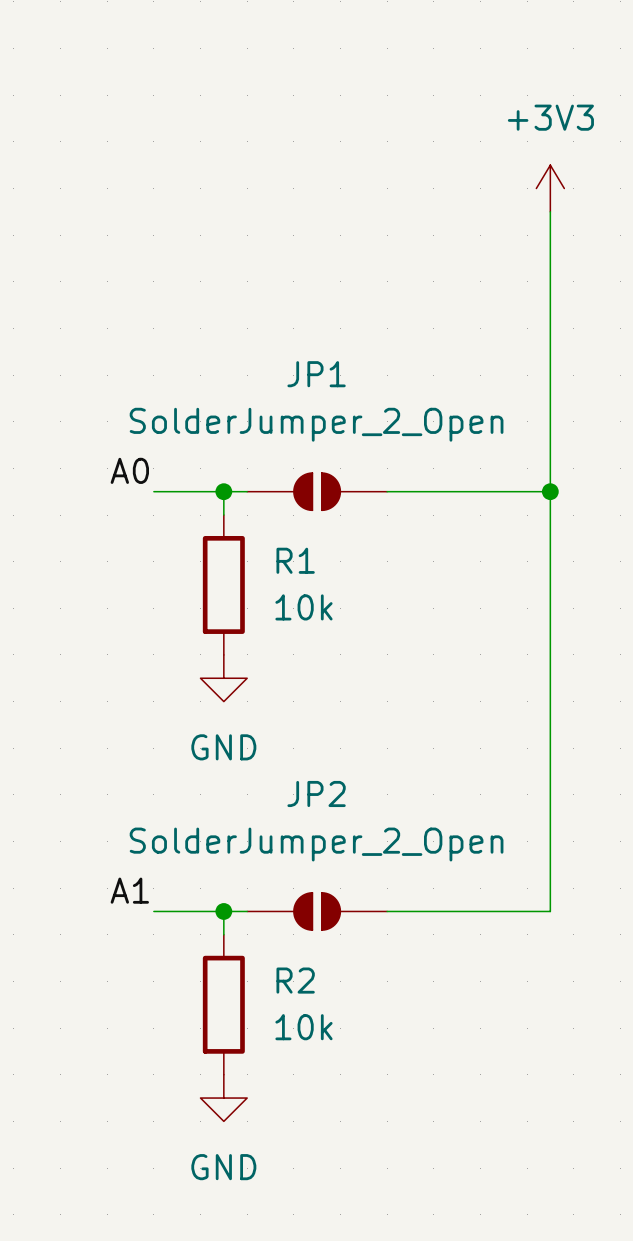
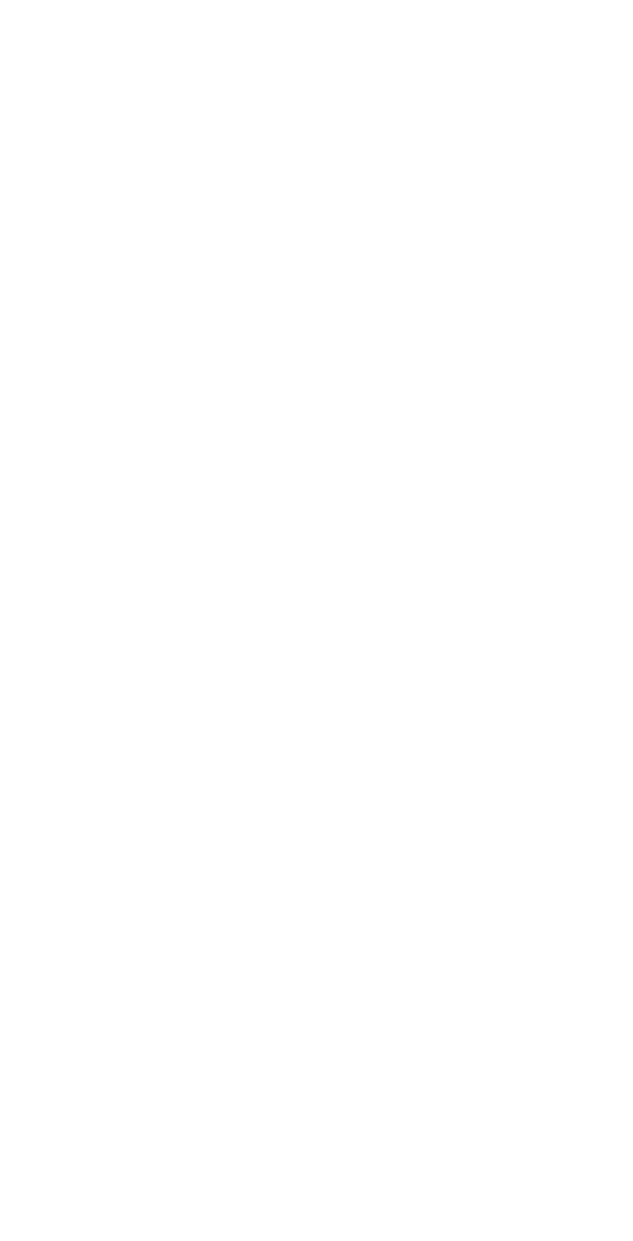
power symbol: +3V3 (550, 188) -> none
wire: (550, 211) (550, 911) (387, 911) -> none
label: A0 (129, 470) -> none
wire: (153, 491) (247, 491) -> none
wire: (223, 491) (223, 515) -> none
junction: (223, 491) -> none
JP1: SolderJumper_2_Open (317, 491) -> none
wire: (387, 491) (550, 491) -> none
junction: (550, 491) -> none
R1: 10k (223, 584) -> none
power symbol: GND (223, 678) -> none
label: A1 (129, 890) -> none
wire: (153, 911) (247, 911) -> none
wire: (223, 911) (223, 934) -> none
junction: (223, 911) -> none
JP2: SolderJumper_2_Open (317, 911) -> none
R2: 10k (223, 1004) -> none
power symbol: GND (223, 1098) -> none

